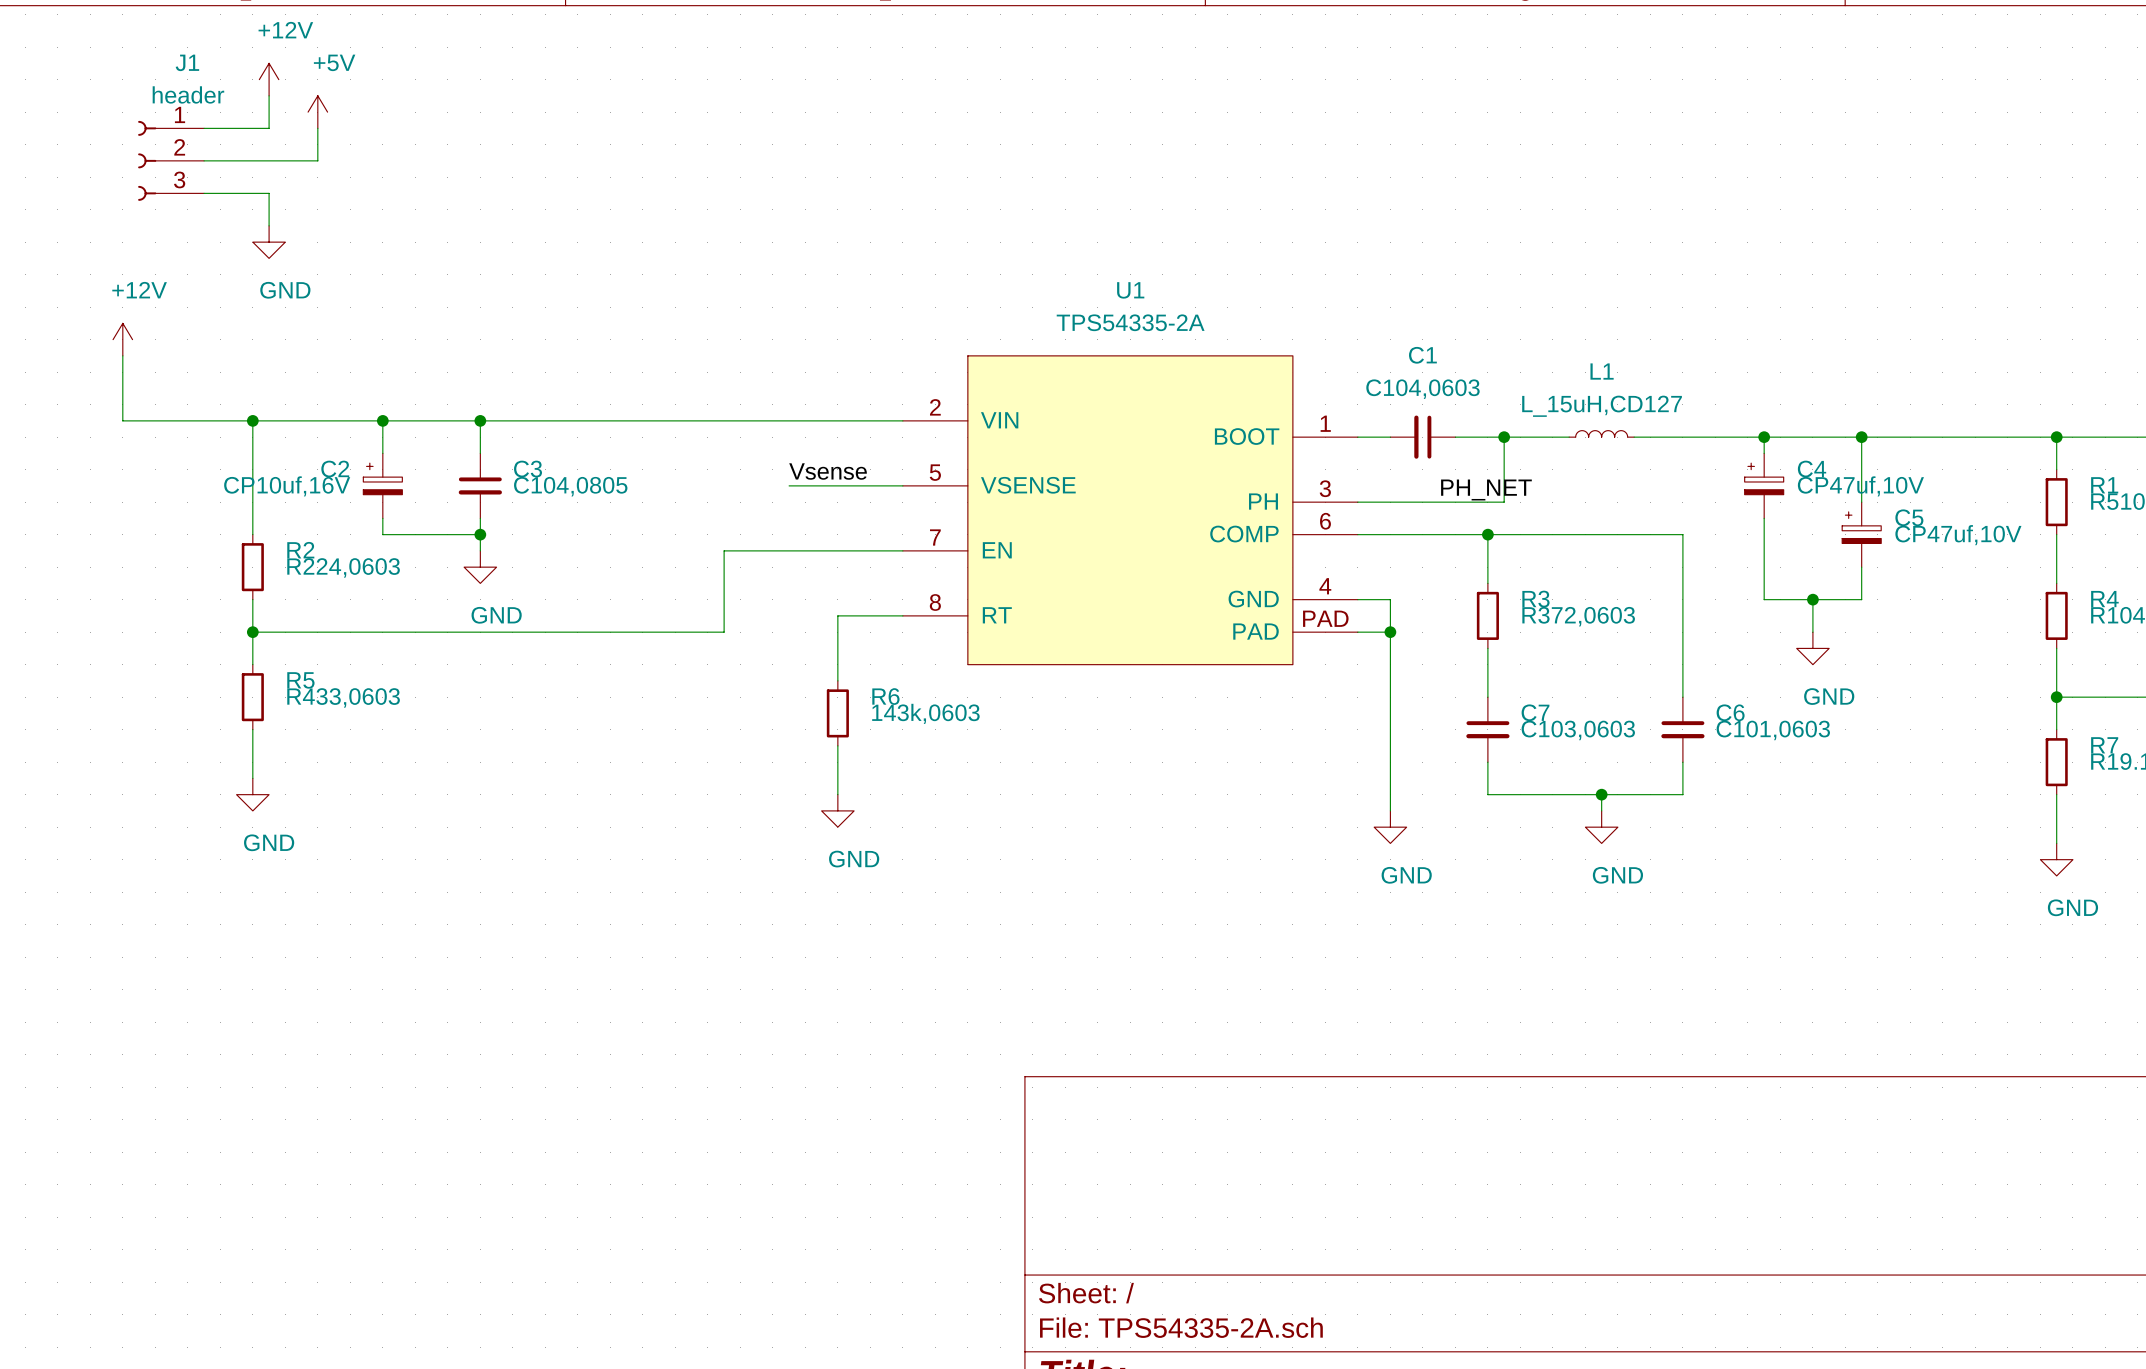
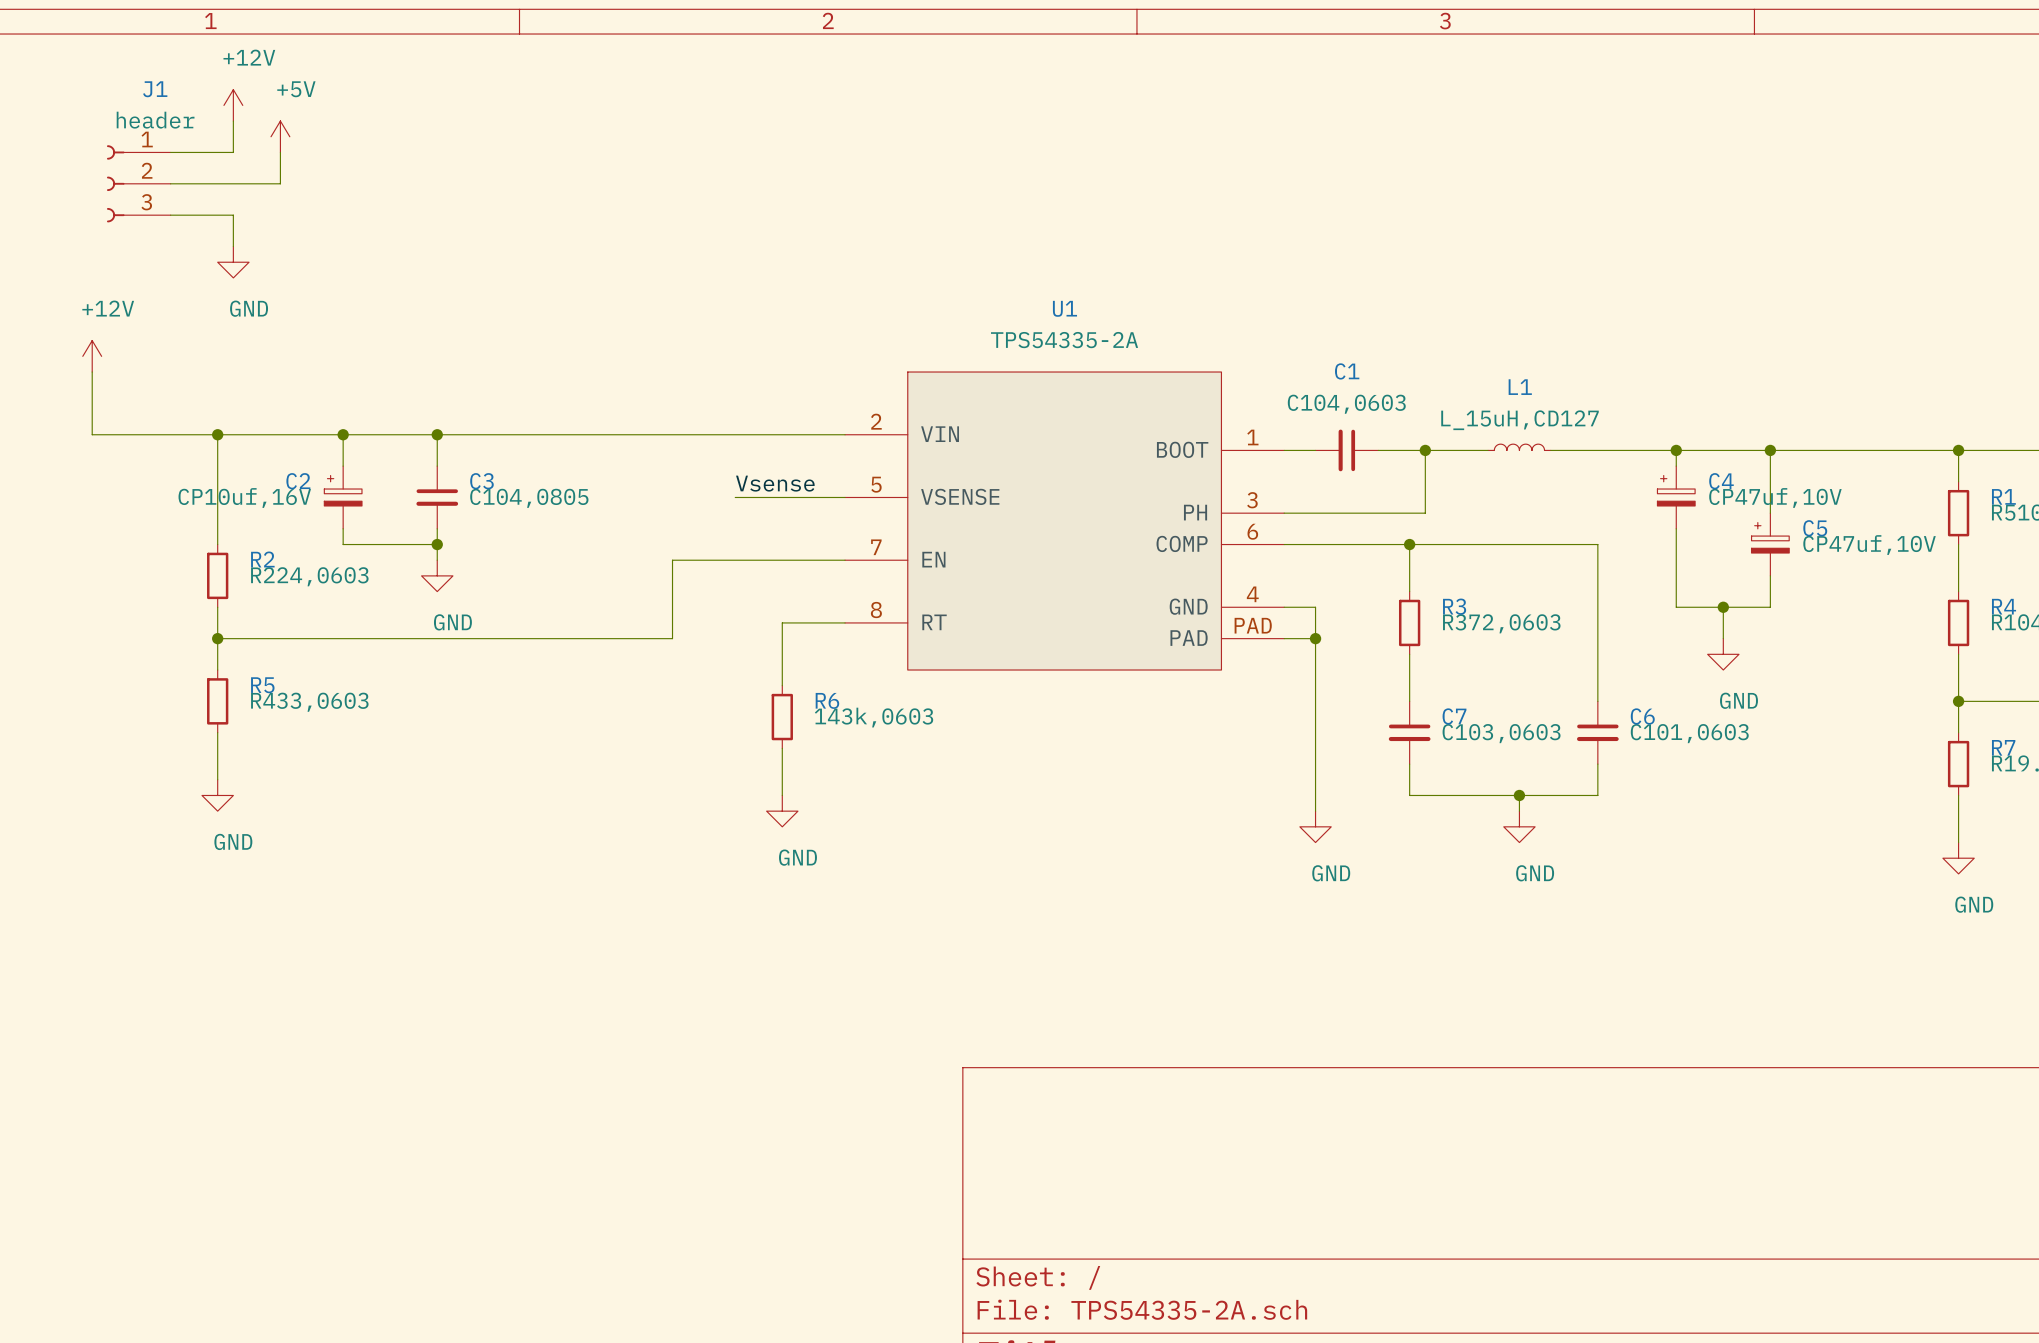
label: PH_NET (1486, 489) -> none

